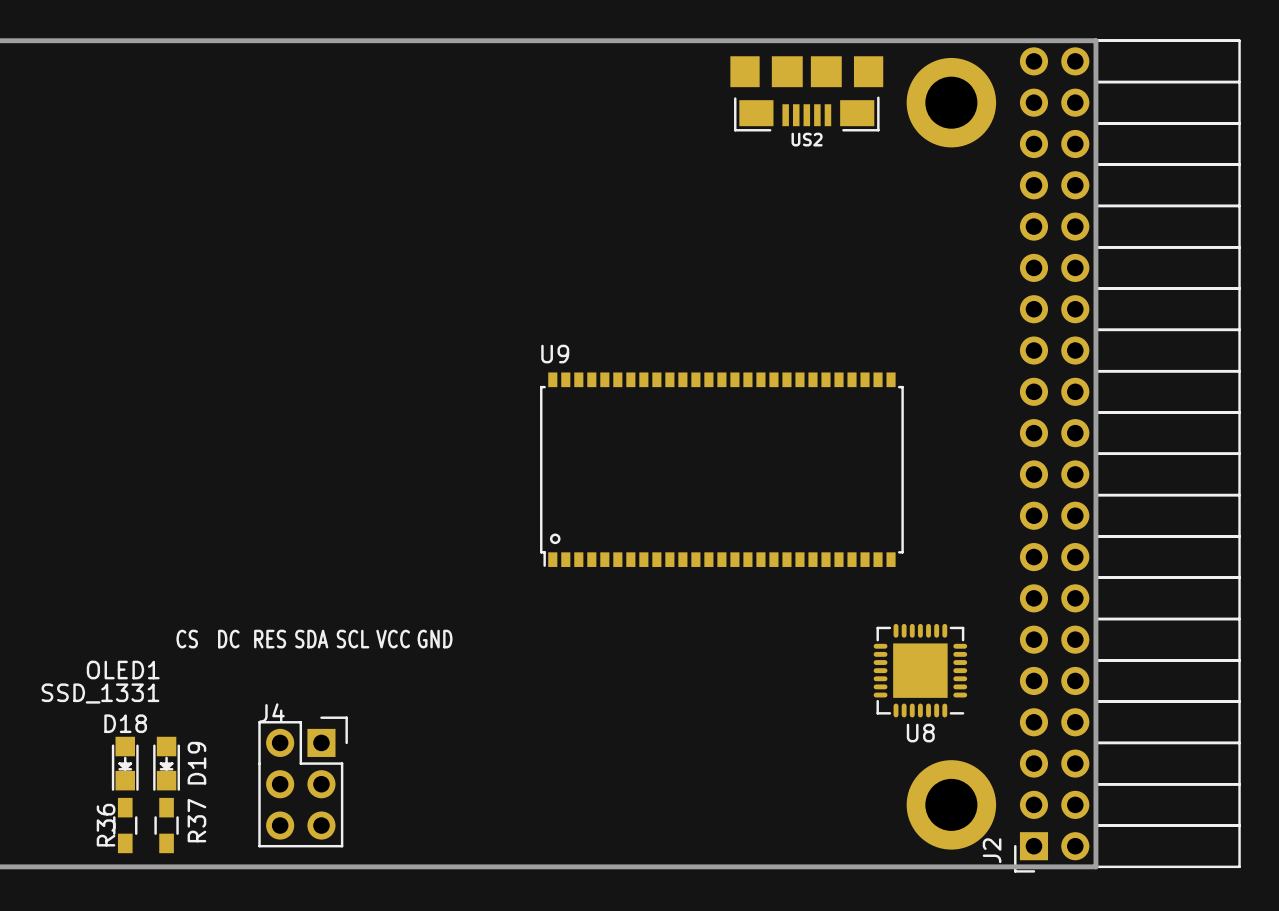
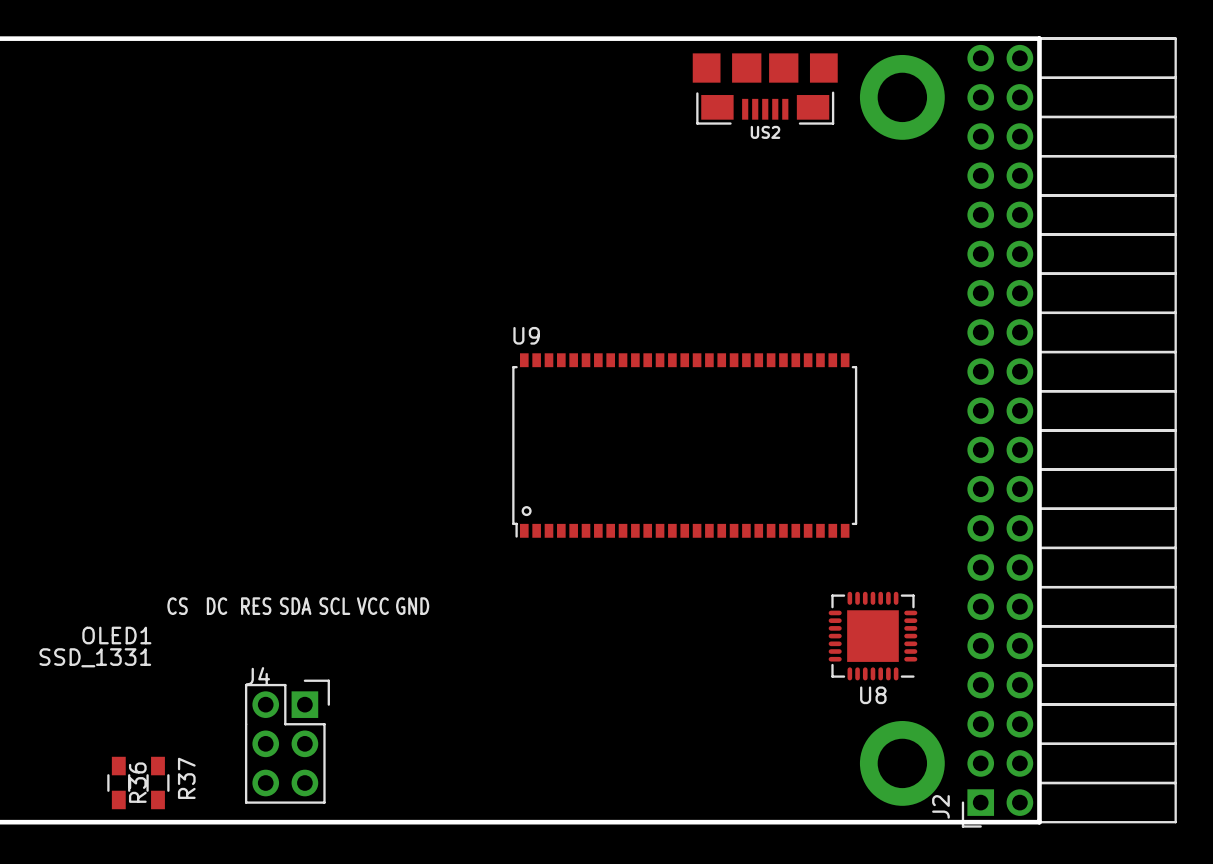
D18: (125, 763) -> none
D19: (166, 763) -> none
R36 name position: R36 (106, 825) -> R36 (137, 782)

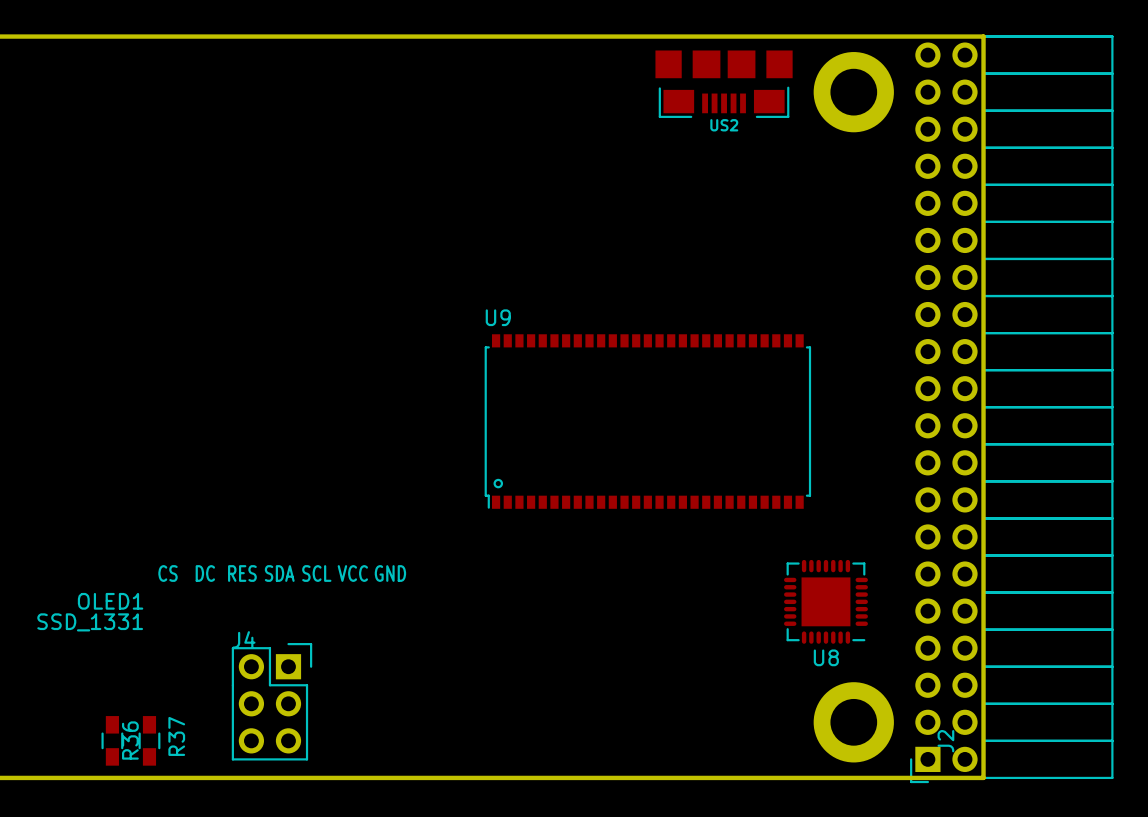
J2 name position: J2 (940, 806) -> J2 (945, 741)

